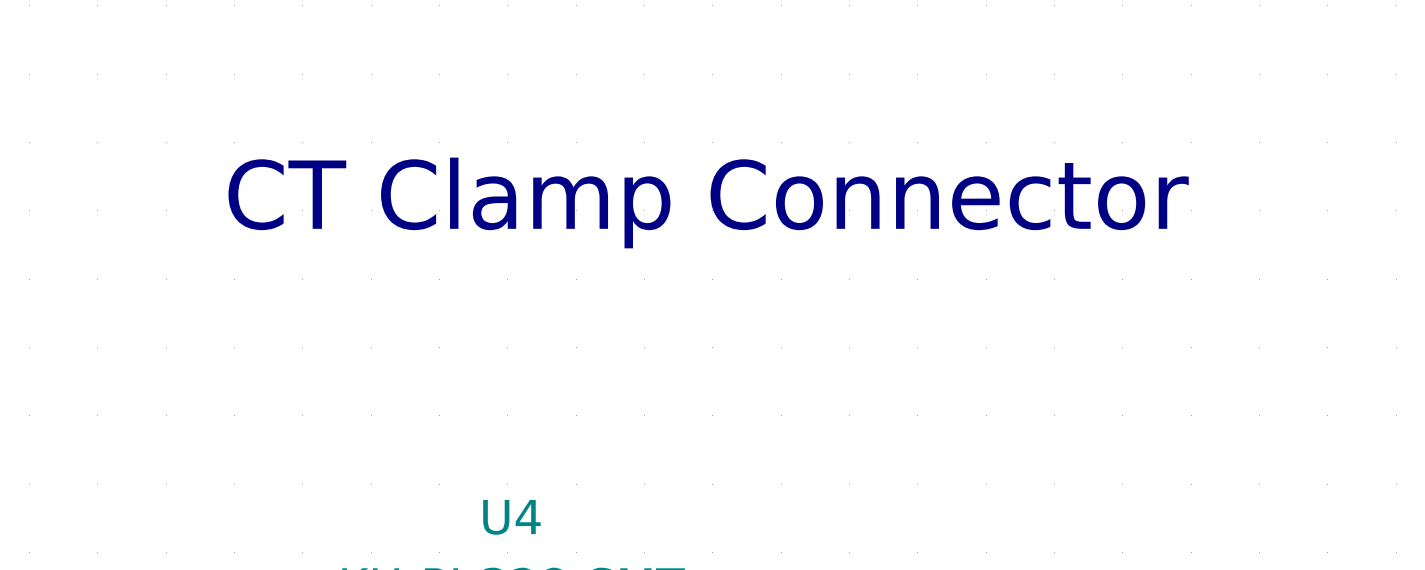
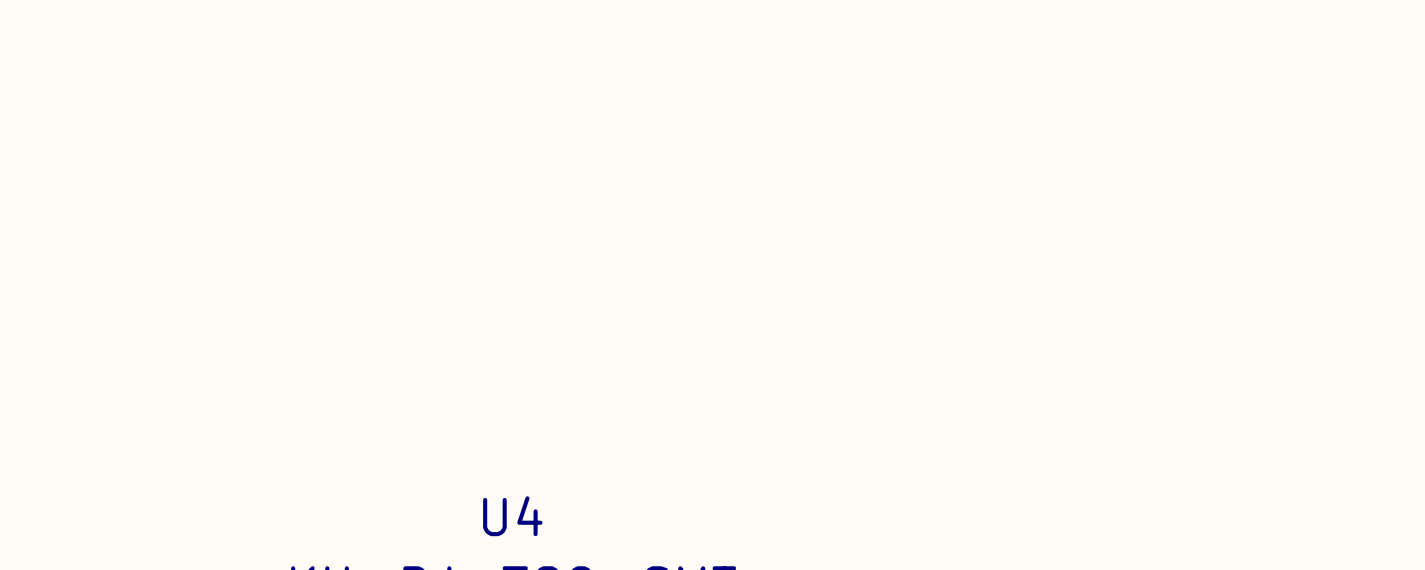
text: CT Clamp Connector (708, 202) -> none

